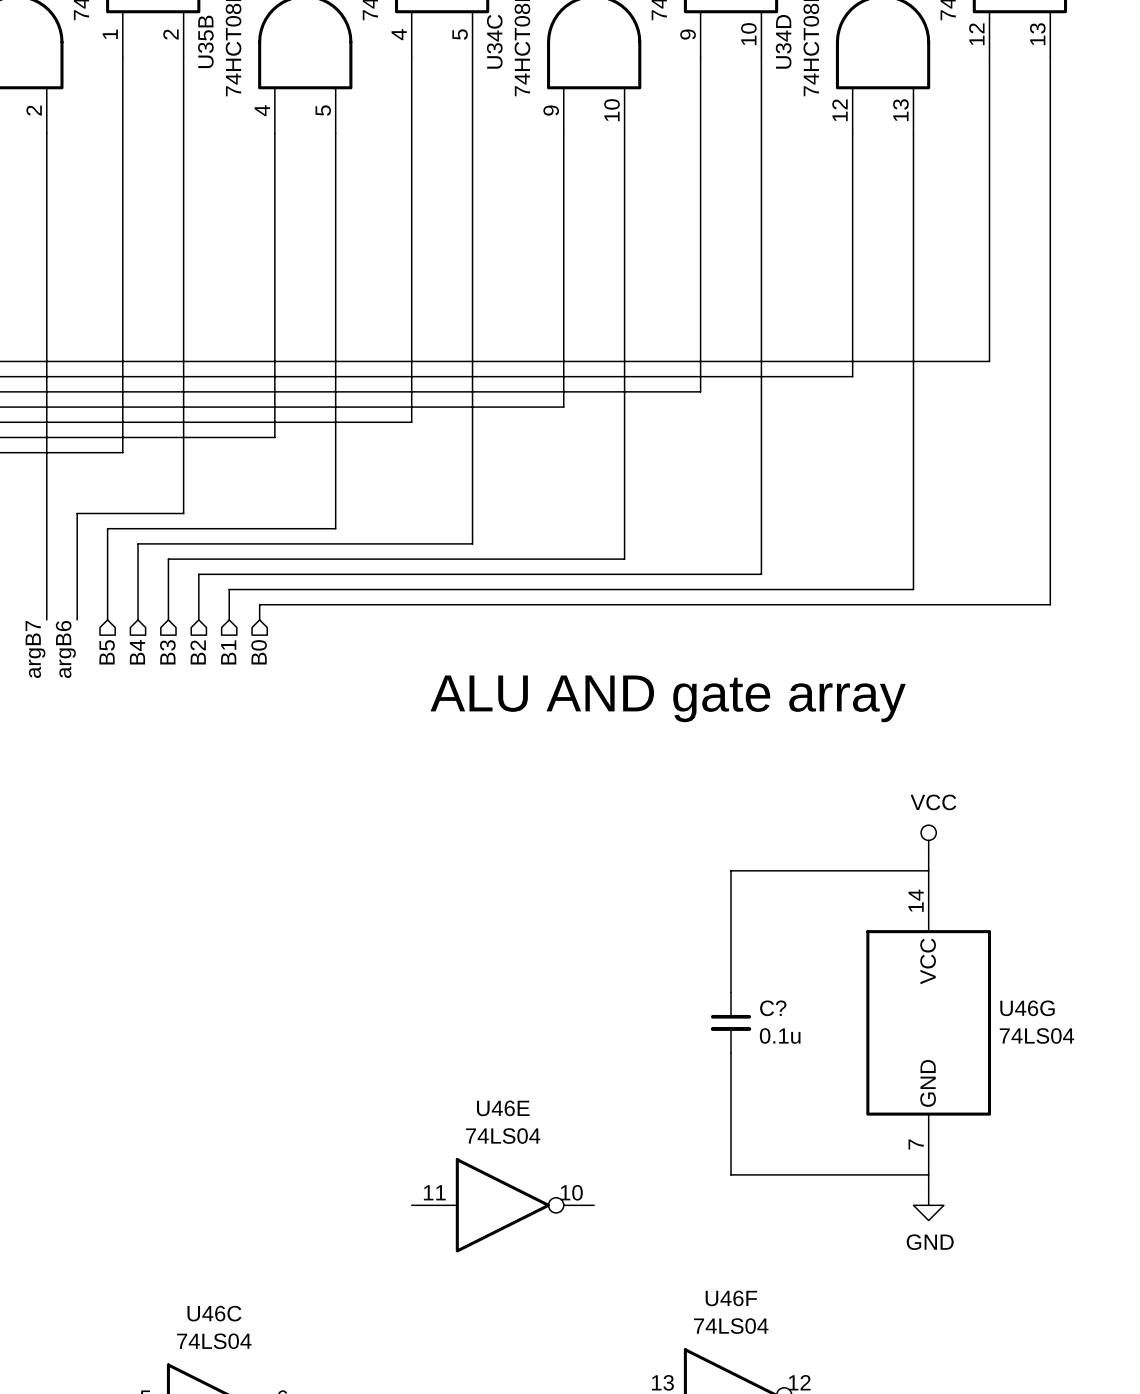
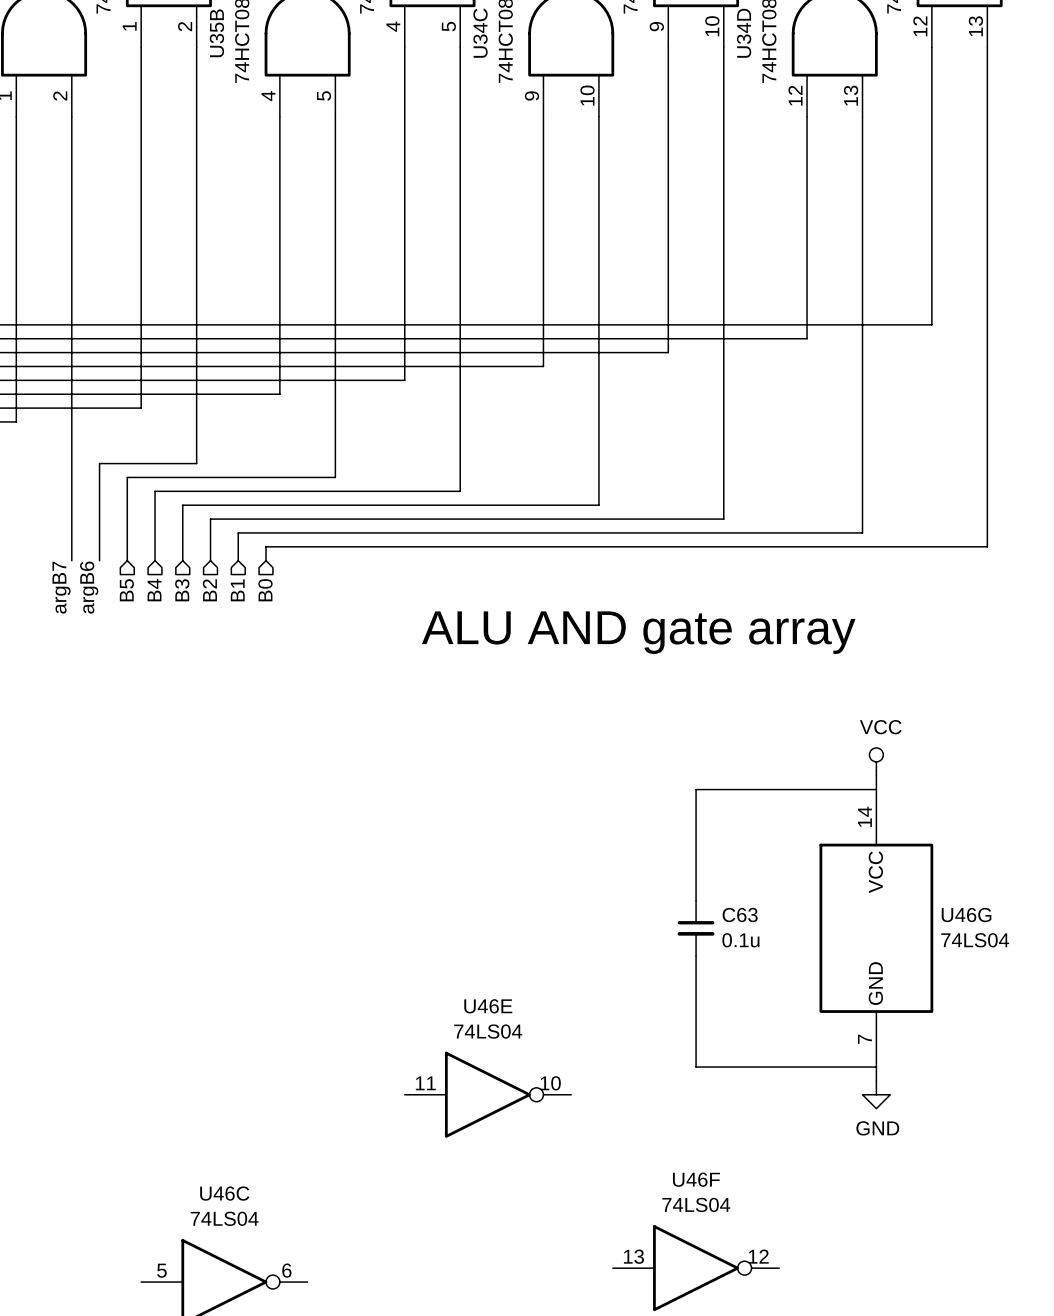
C? name: C? (773, 1008) -> C63 (740, 915)

